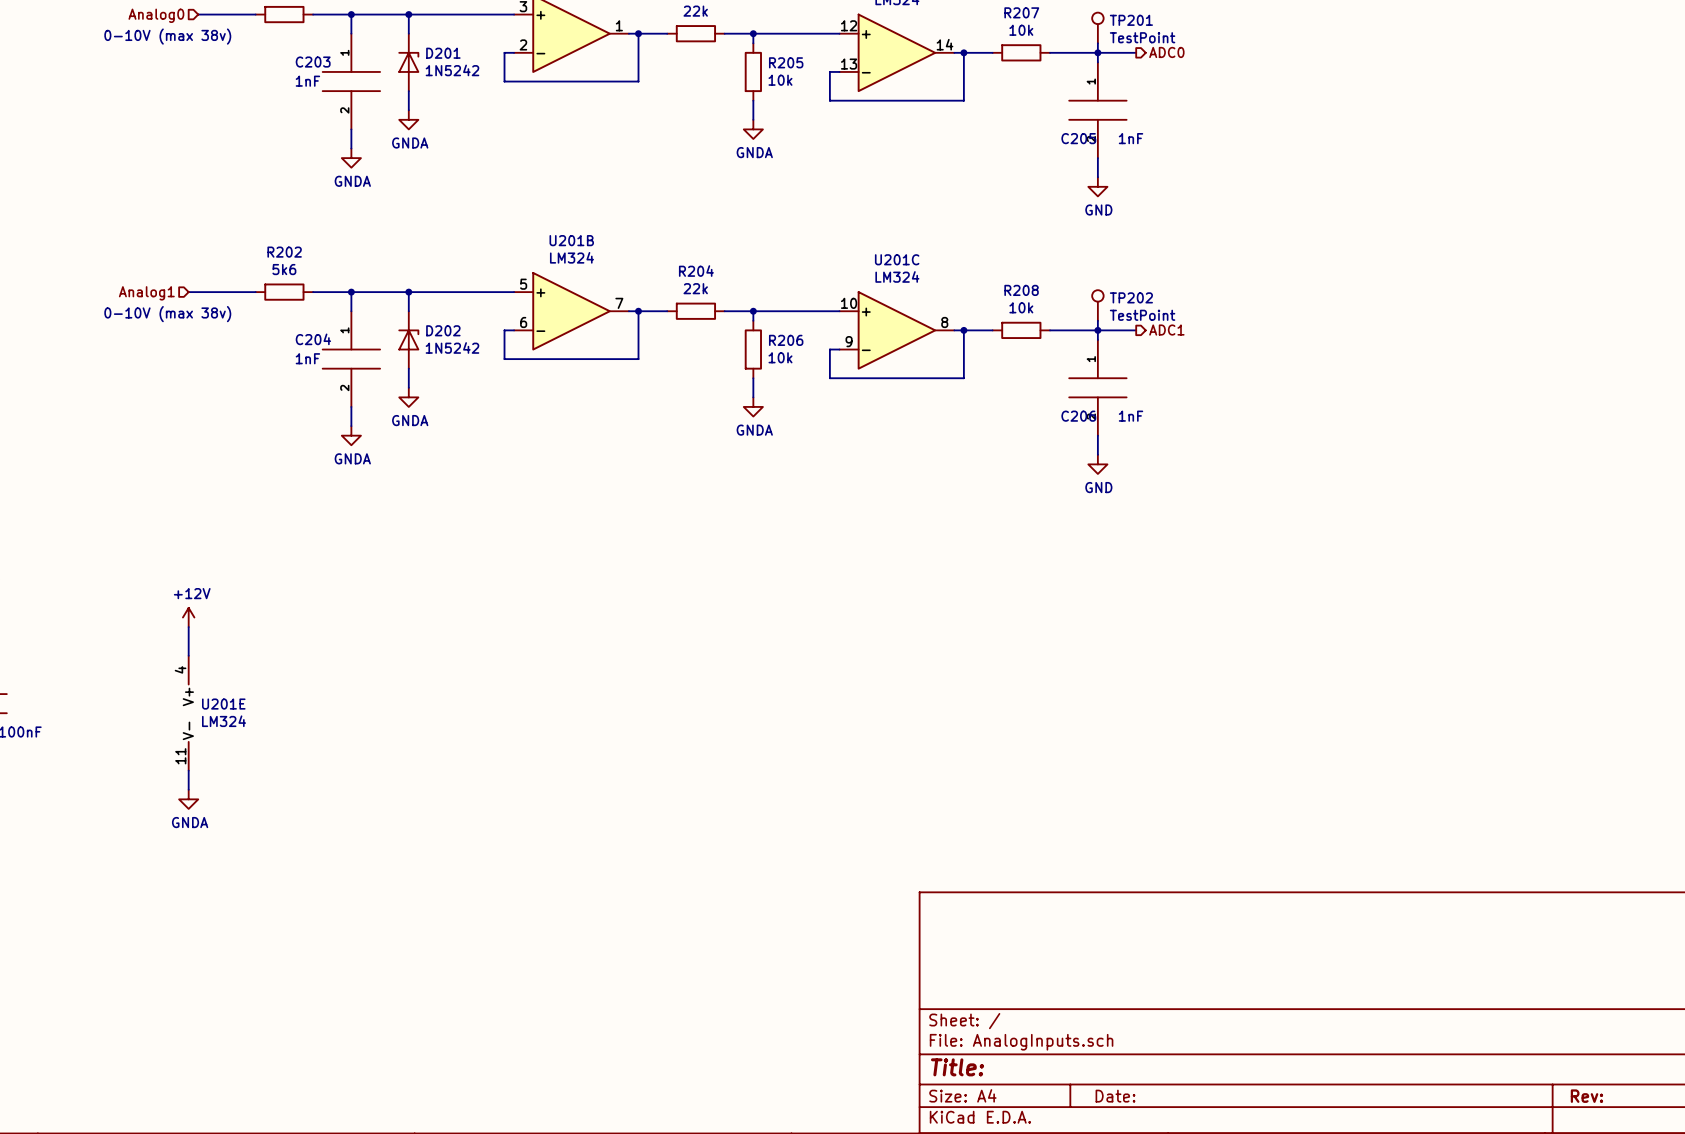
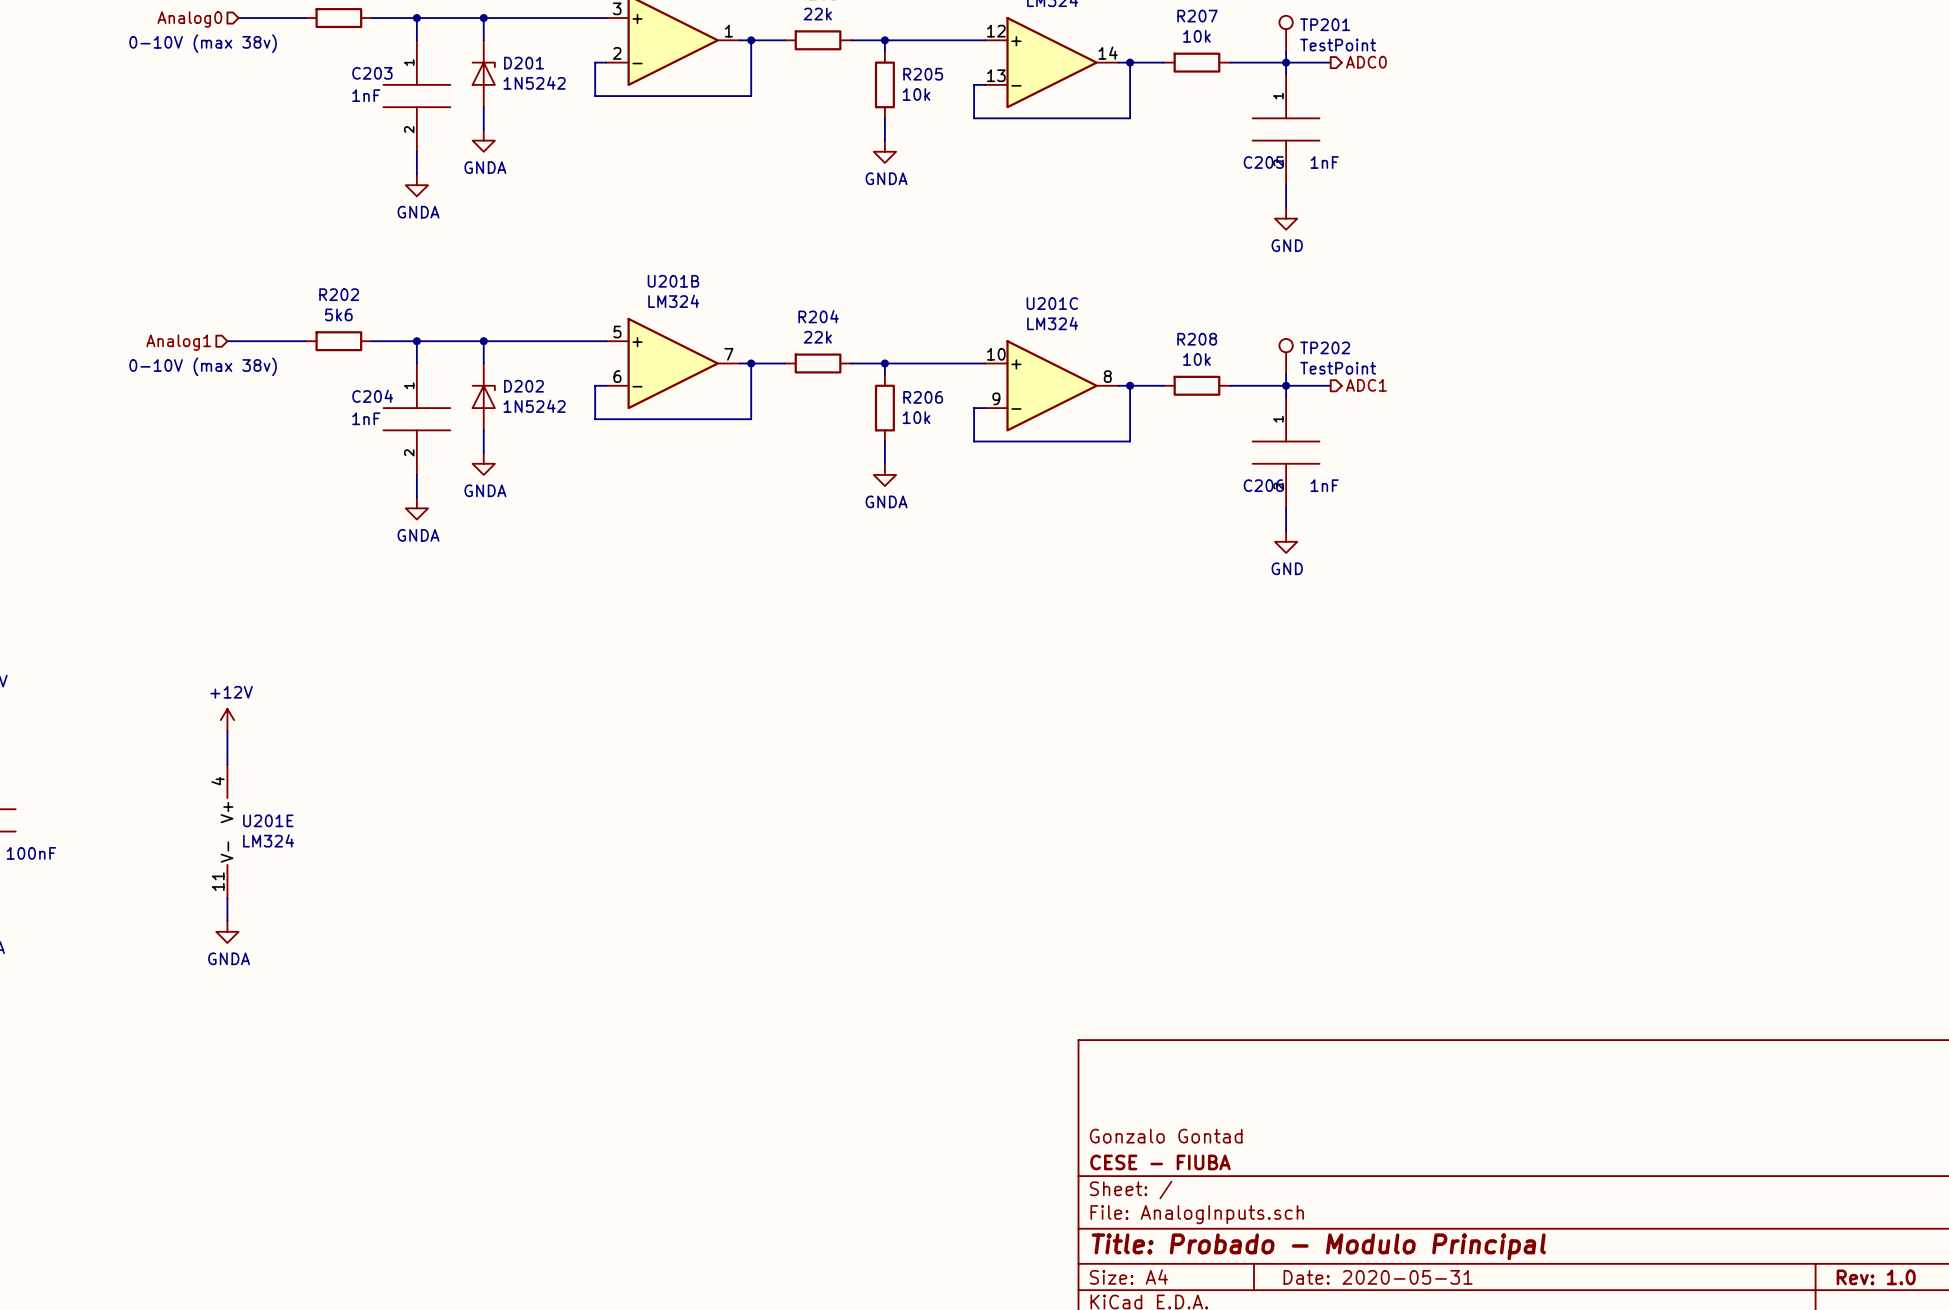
title block: none -> Gonzalo Gontad (1166, 1136)
title block: none -> CESE - FIUBA (1160, 1162)
title block: Title: (957, 1067) -> Title: Probado - Modulo Principal (1318, 1246)
title block: Date: (1115, 1096) -> Date: 2020-05-31 (1378, 1277)
title block: Rev: (1586, 1096) -> Rev: 1.0 (1876, 1277)

